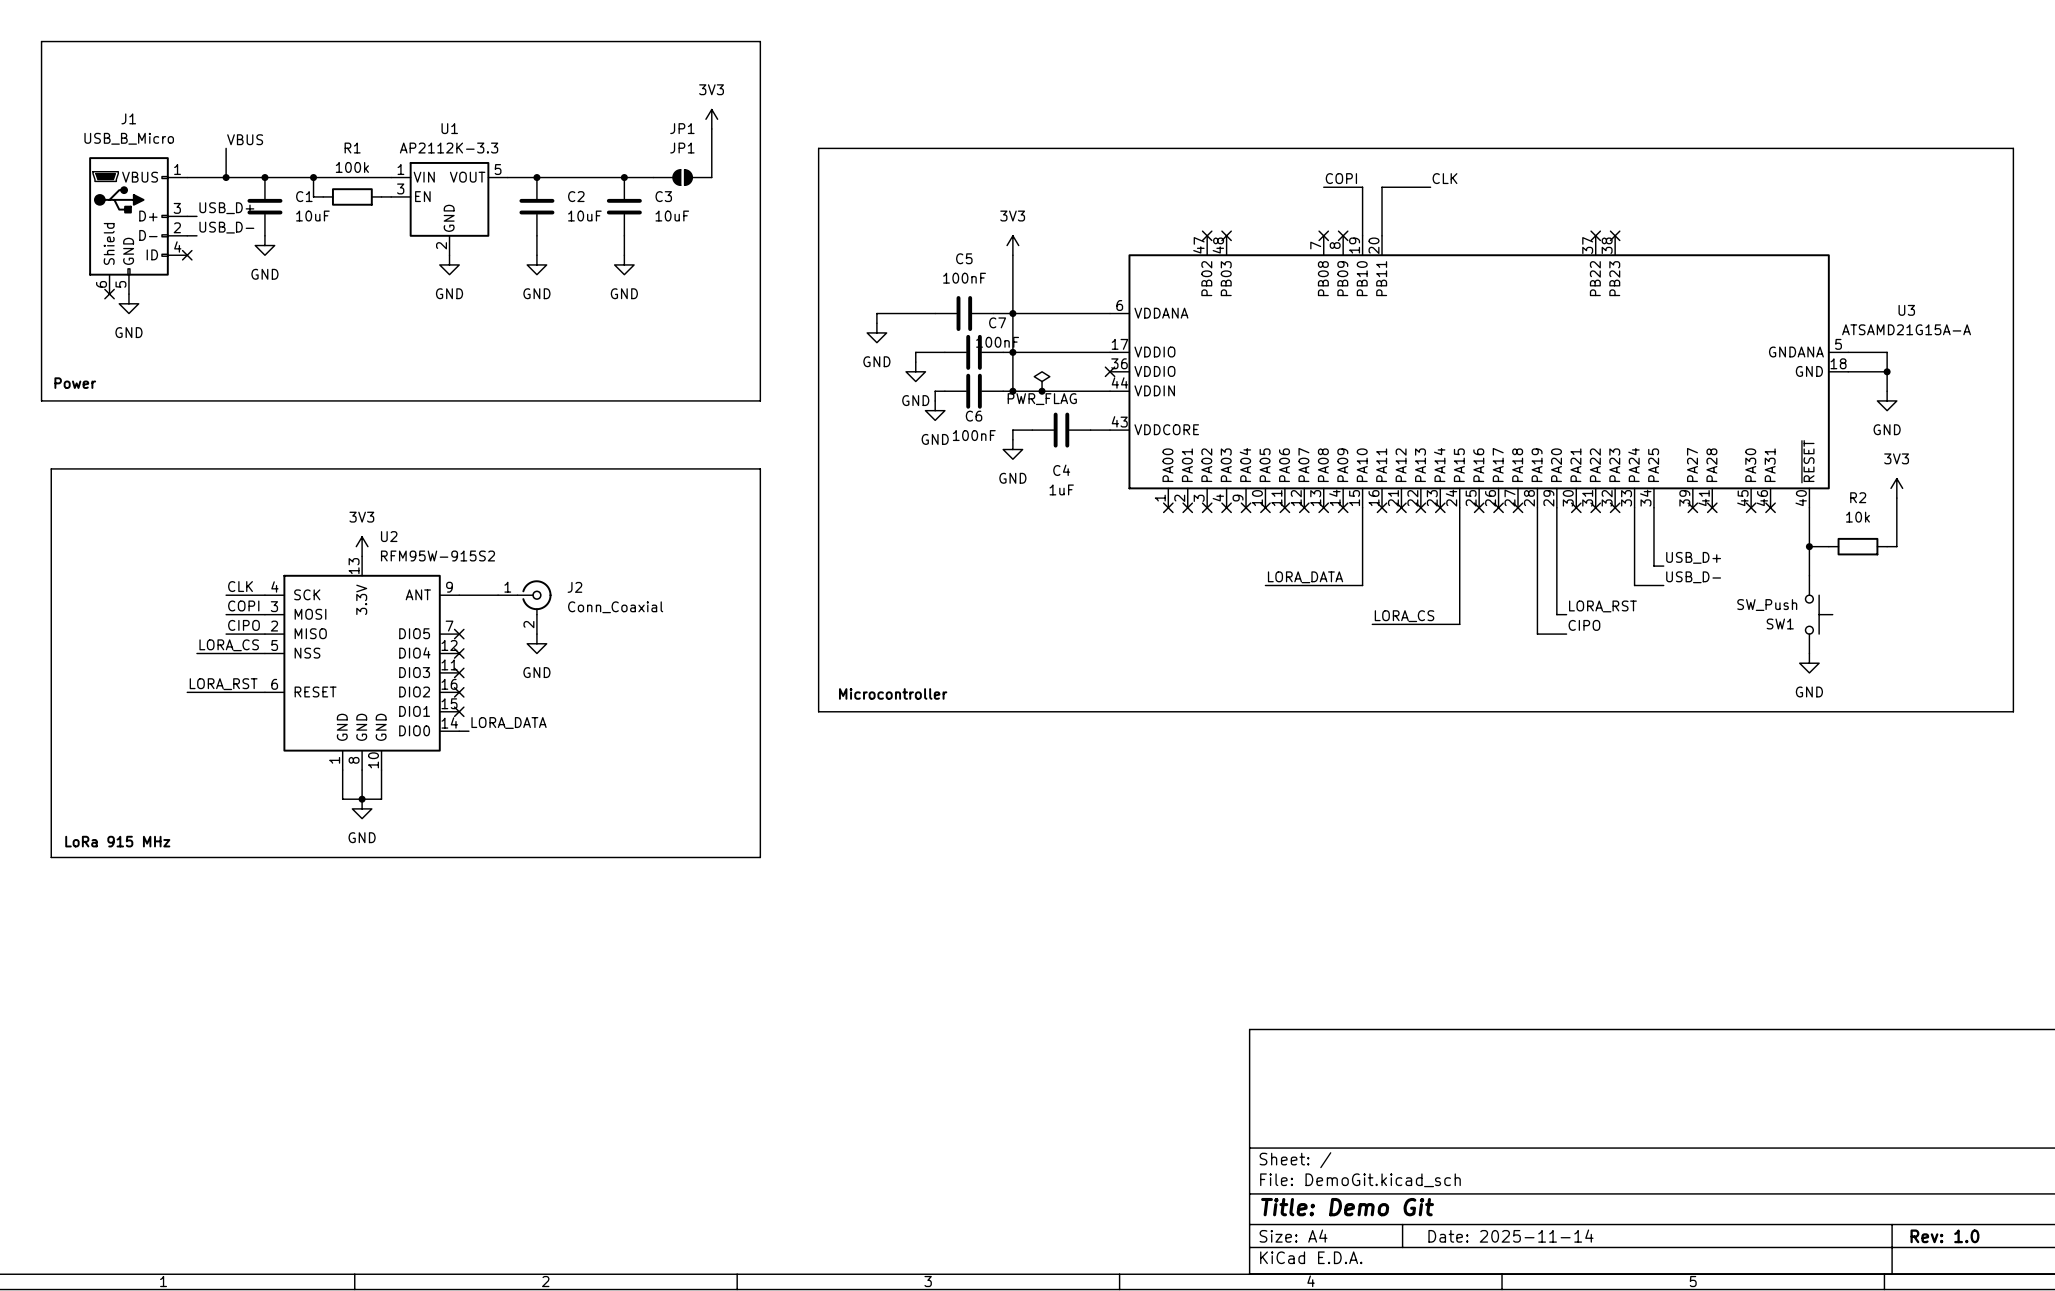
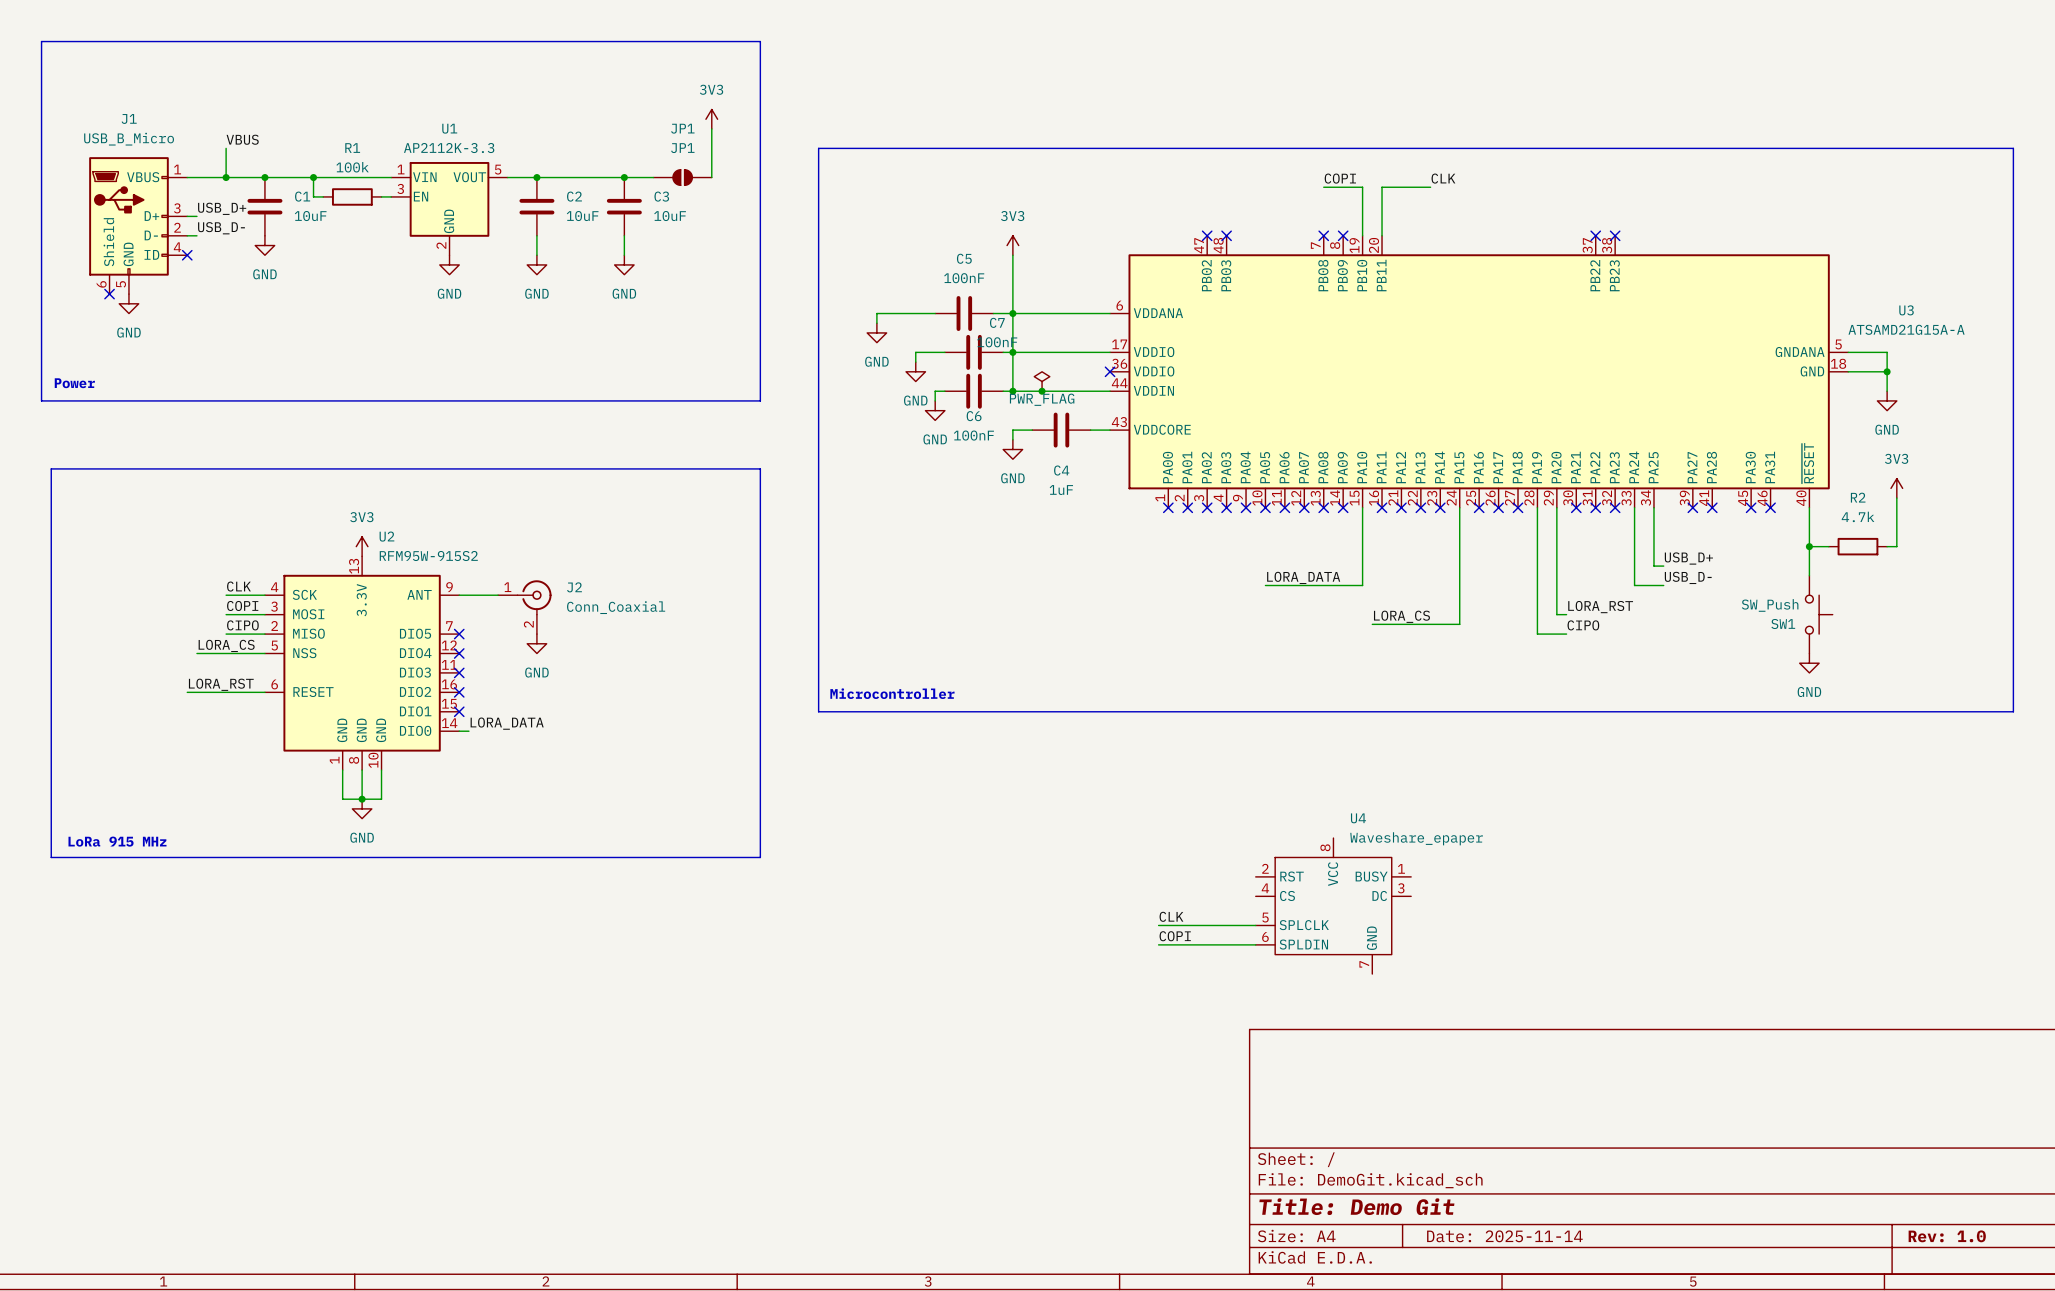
R2 value: 10k (1857, 517) -> 4.7k (1858, 516)
U4: none -> Waveshare_epaper (1333, 906)
label: none -> CLK (1171, 916)
wire: none -> (1158, 925) (1255, 925)
label: none -> COPI (1175, 936)
wire: none -> (1158, 944) (1255, 944)

